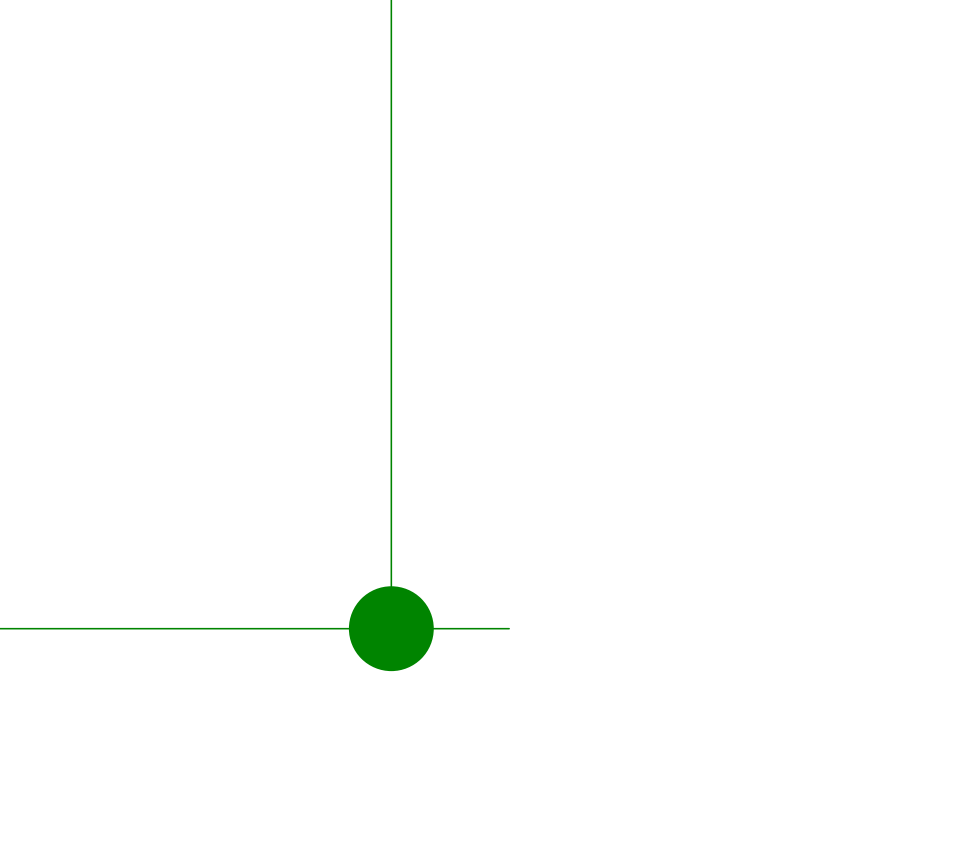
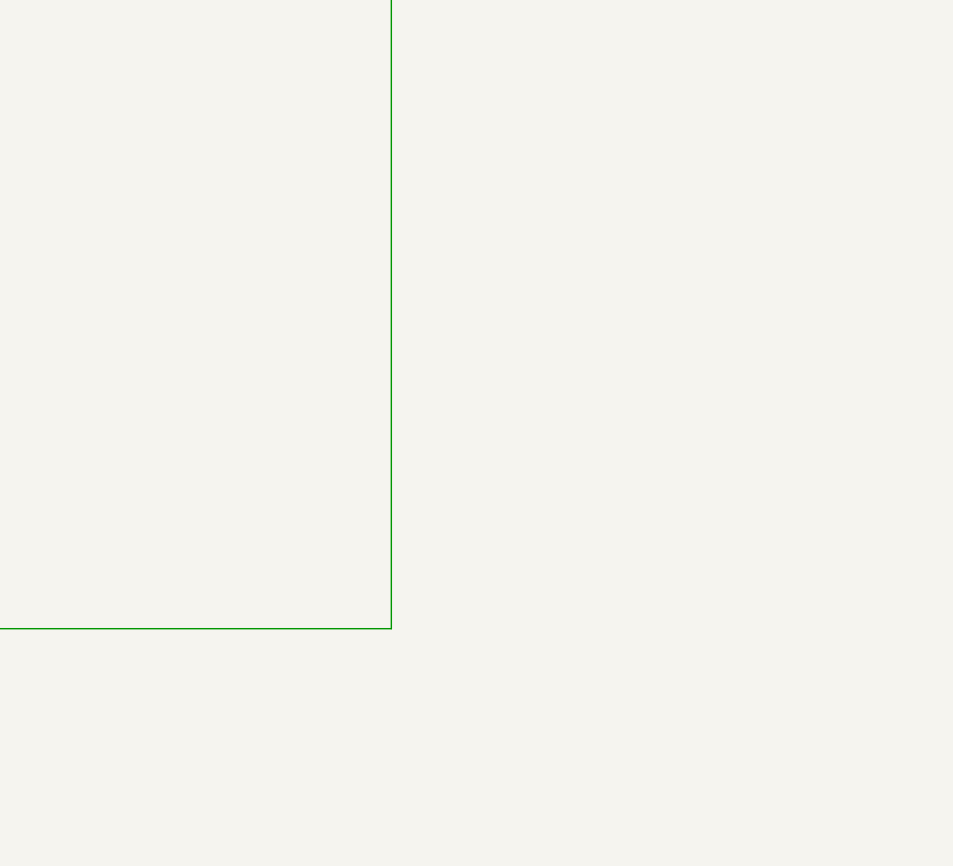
wire: (391, 628) (509, 628) -> none
junction: (391, 628) -> none

